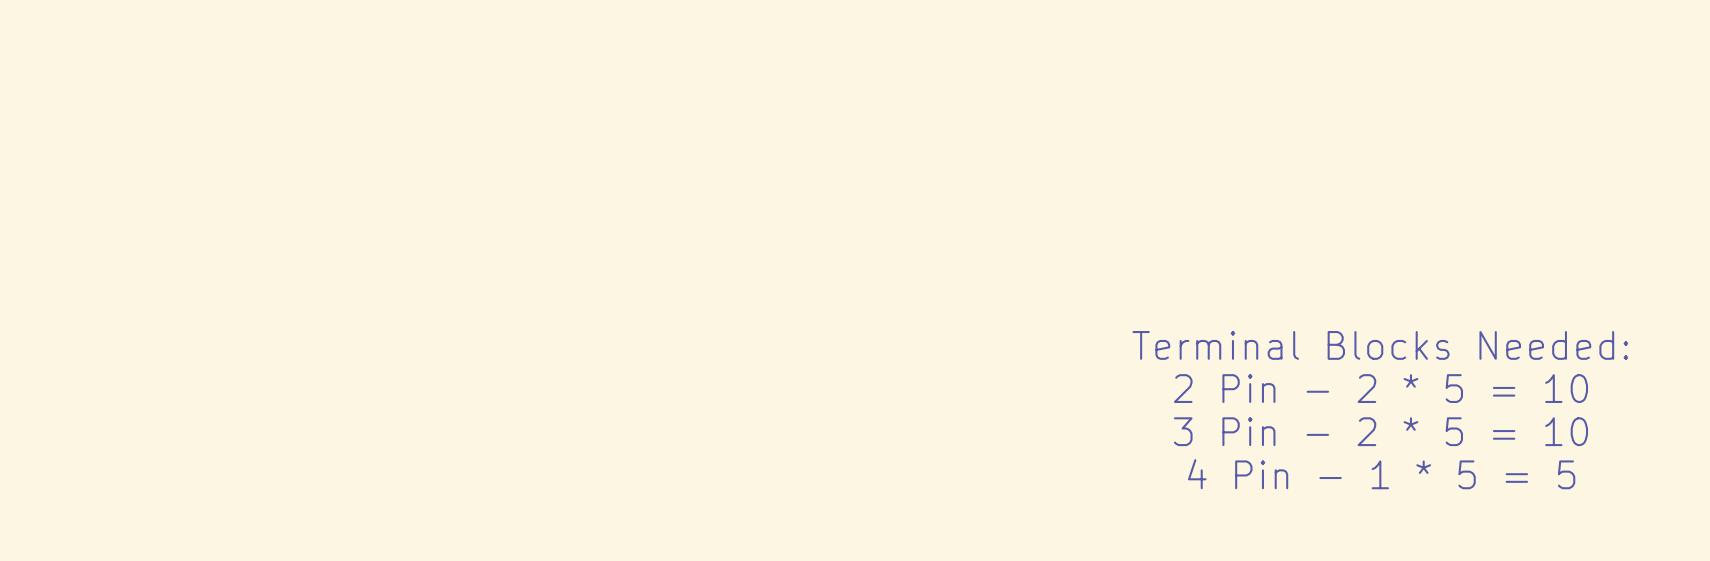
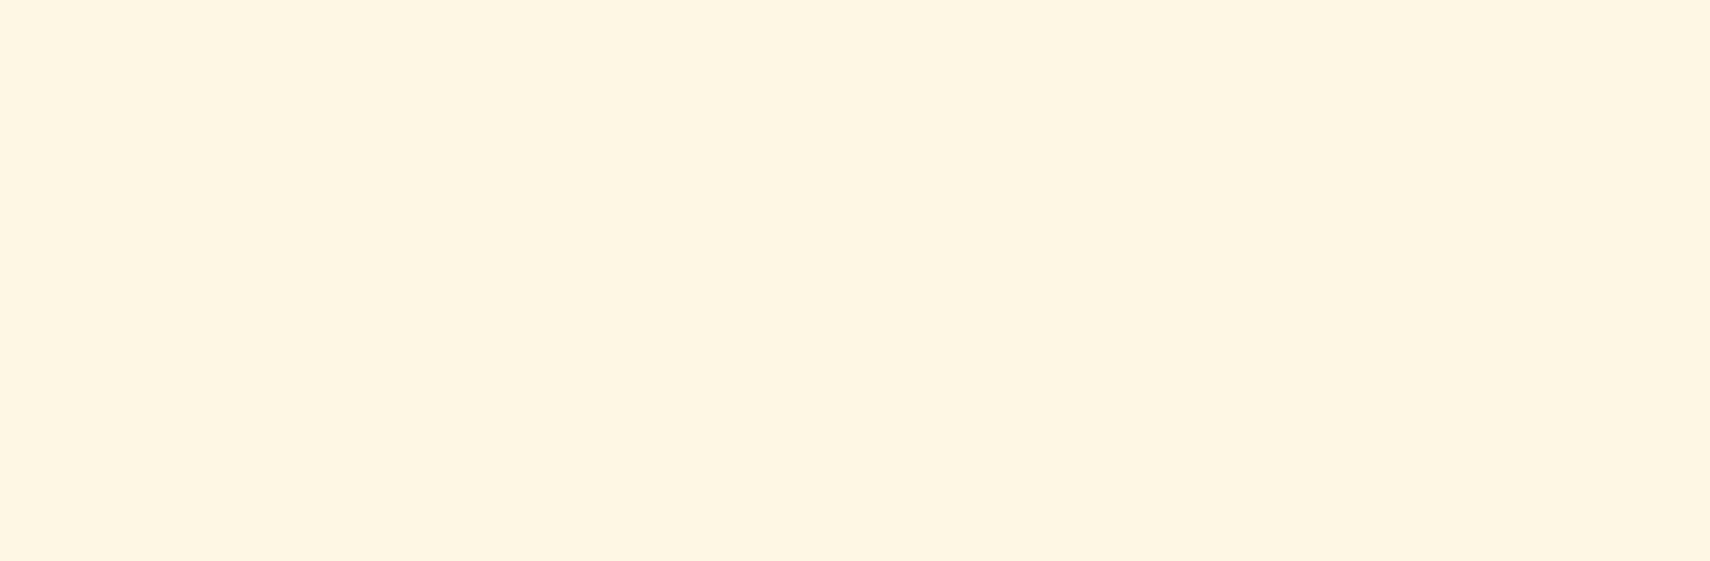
text: Terminal Blocks Needed: (1380, 345) -> none
text: 2 Pin - 2 * 5 = 10 (1380, 388) -> none
text: 3 Pin - 2 * 5 = 10 (1380, 431) -> none
text: 4 Pin - 1 * 5 = 5 (1381, 474) -> none

